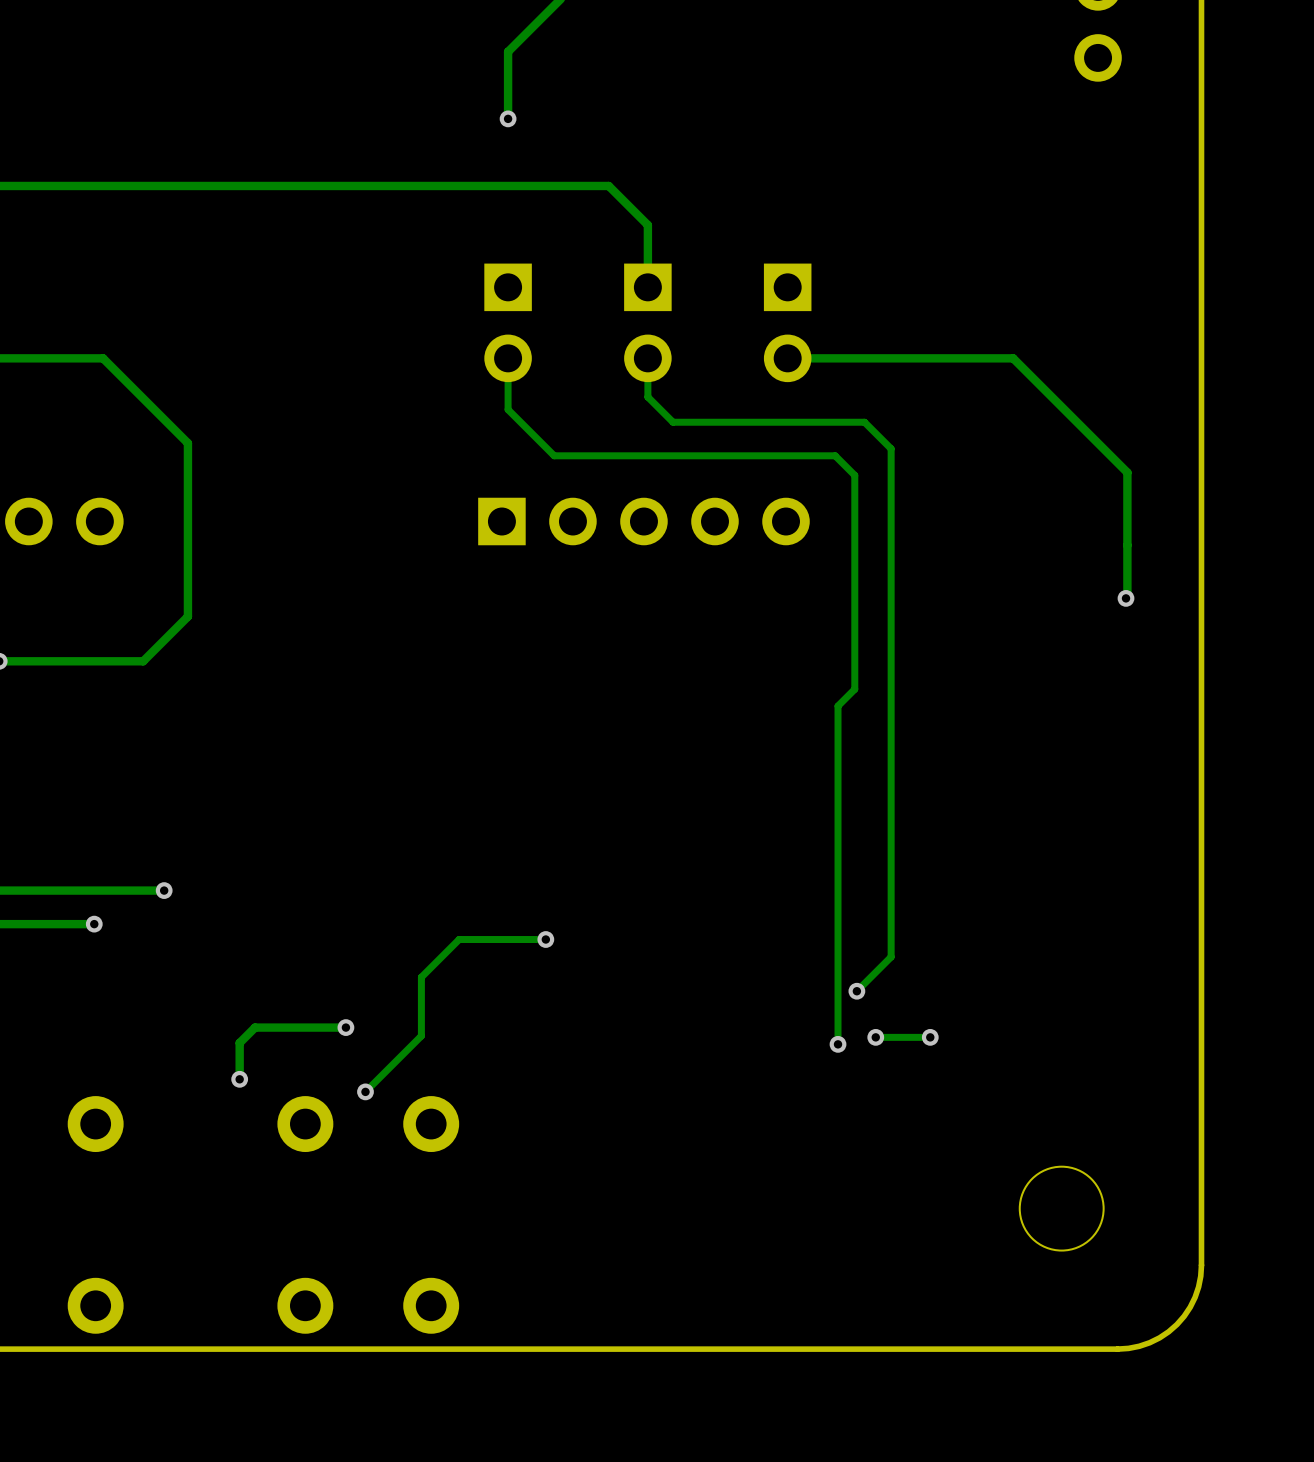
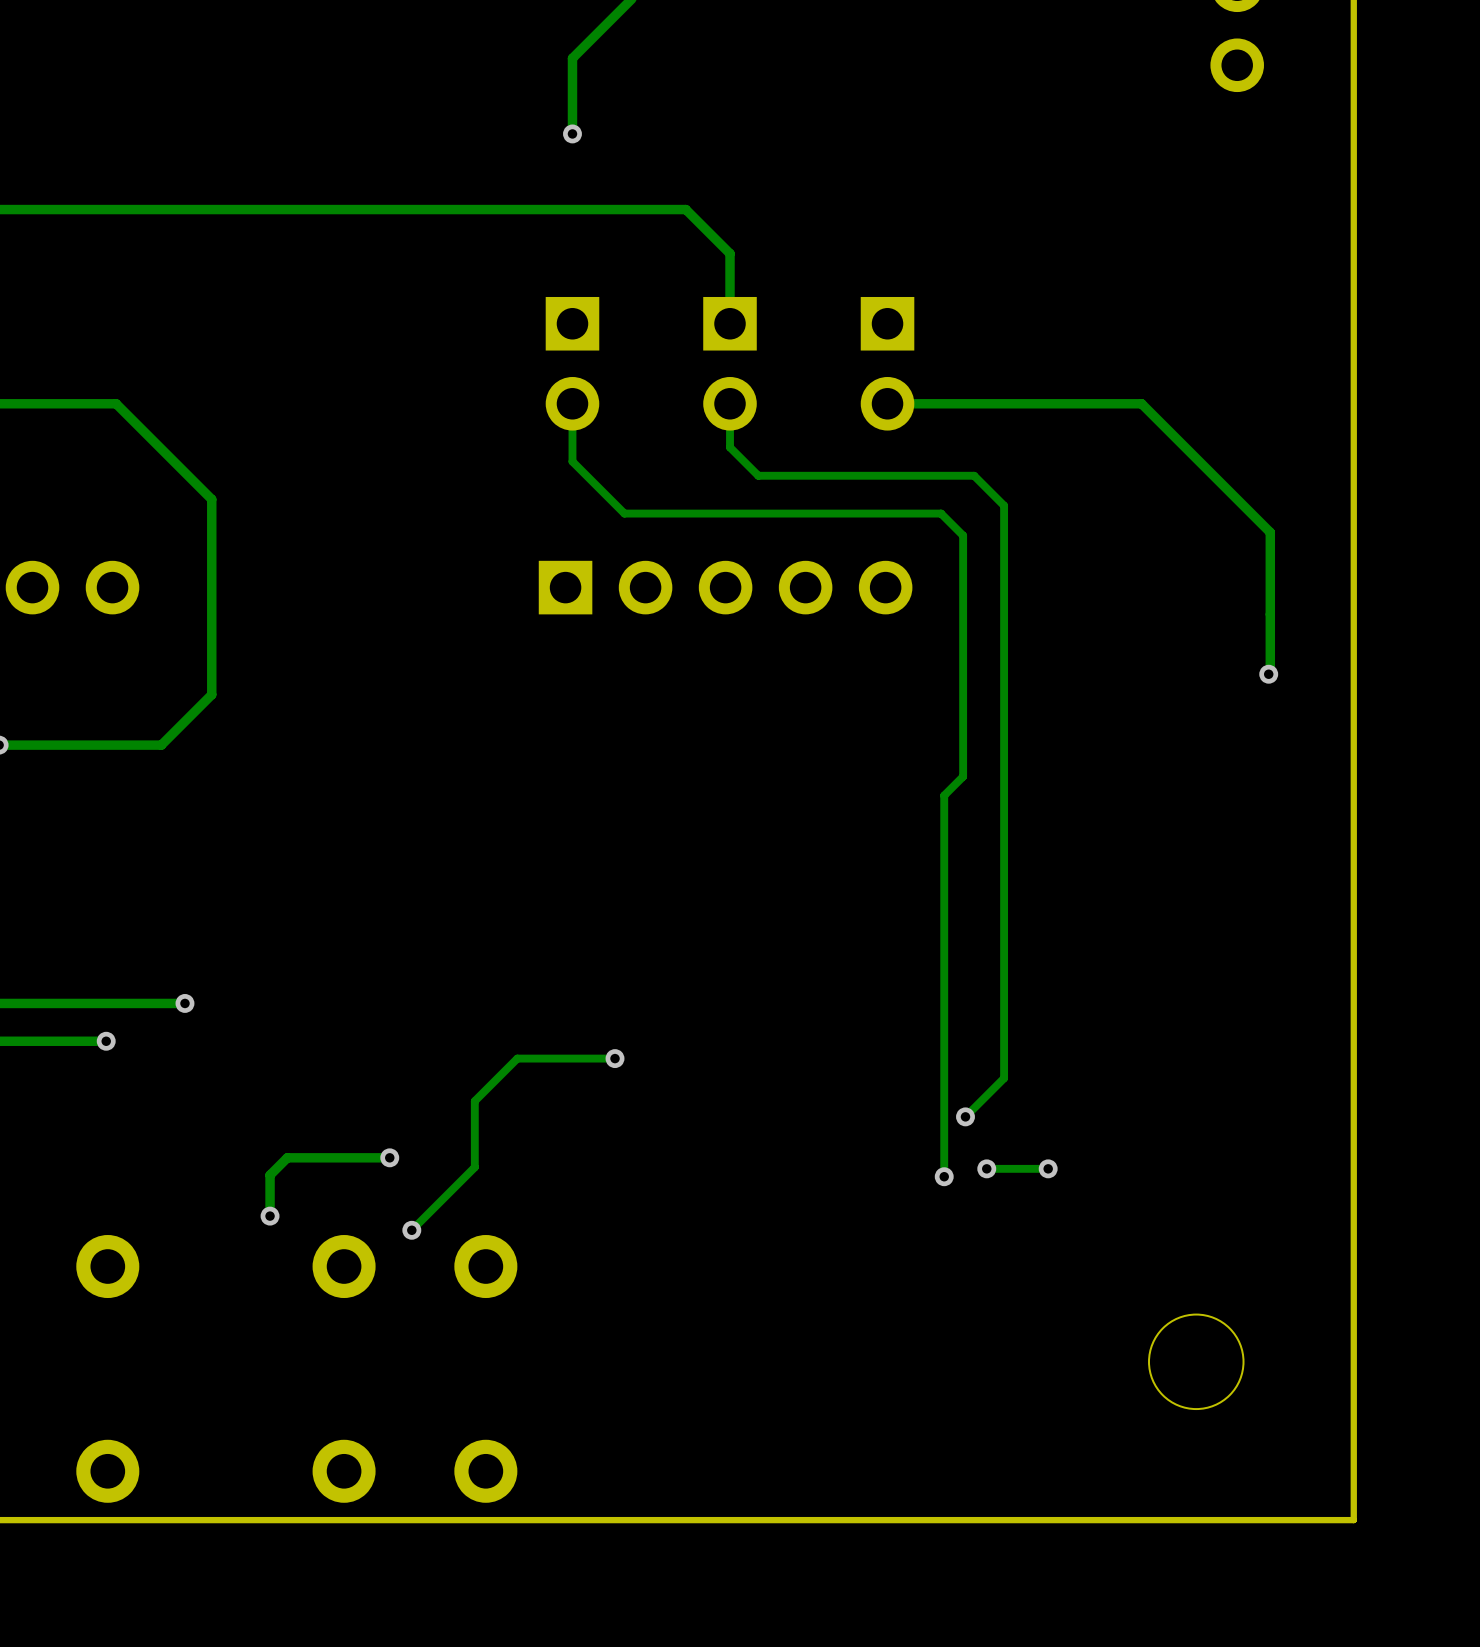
board edge: (1201, 1265) (1195, 1297) (1176, 1324) (1149, 1342) (1117, 1349) -> (1353, 1425) (1353, 1520) (1259, 1520)

